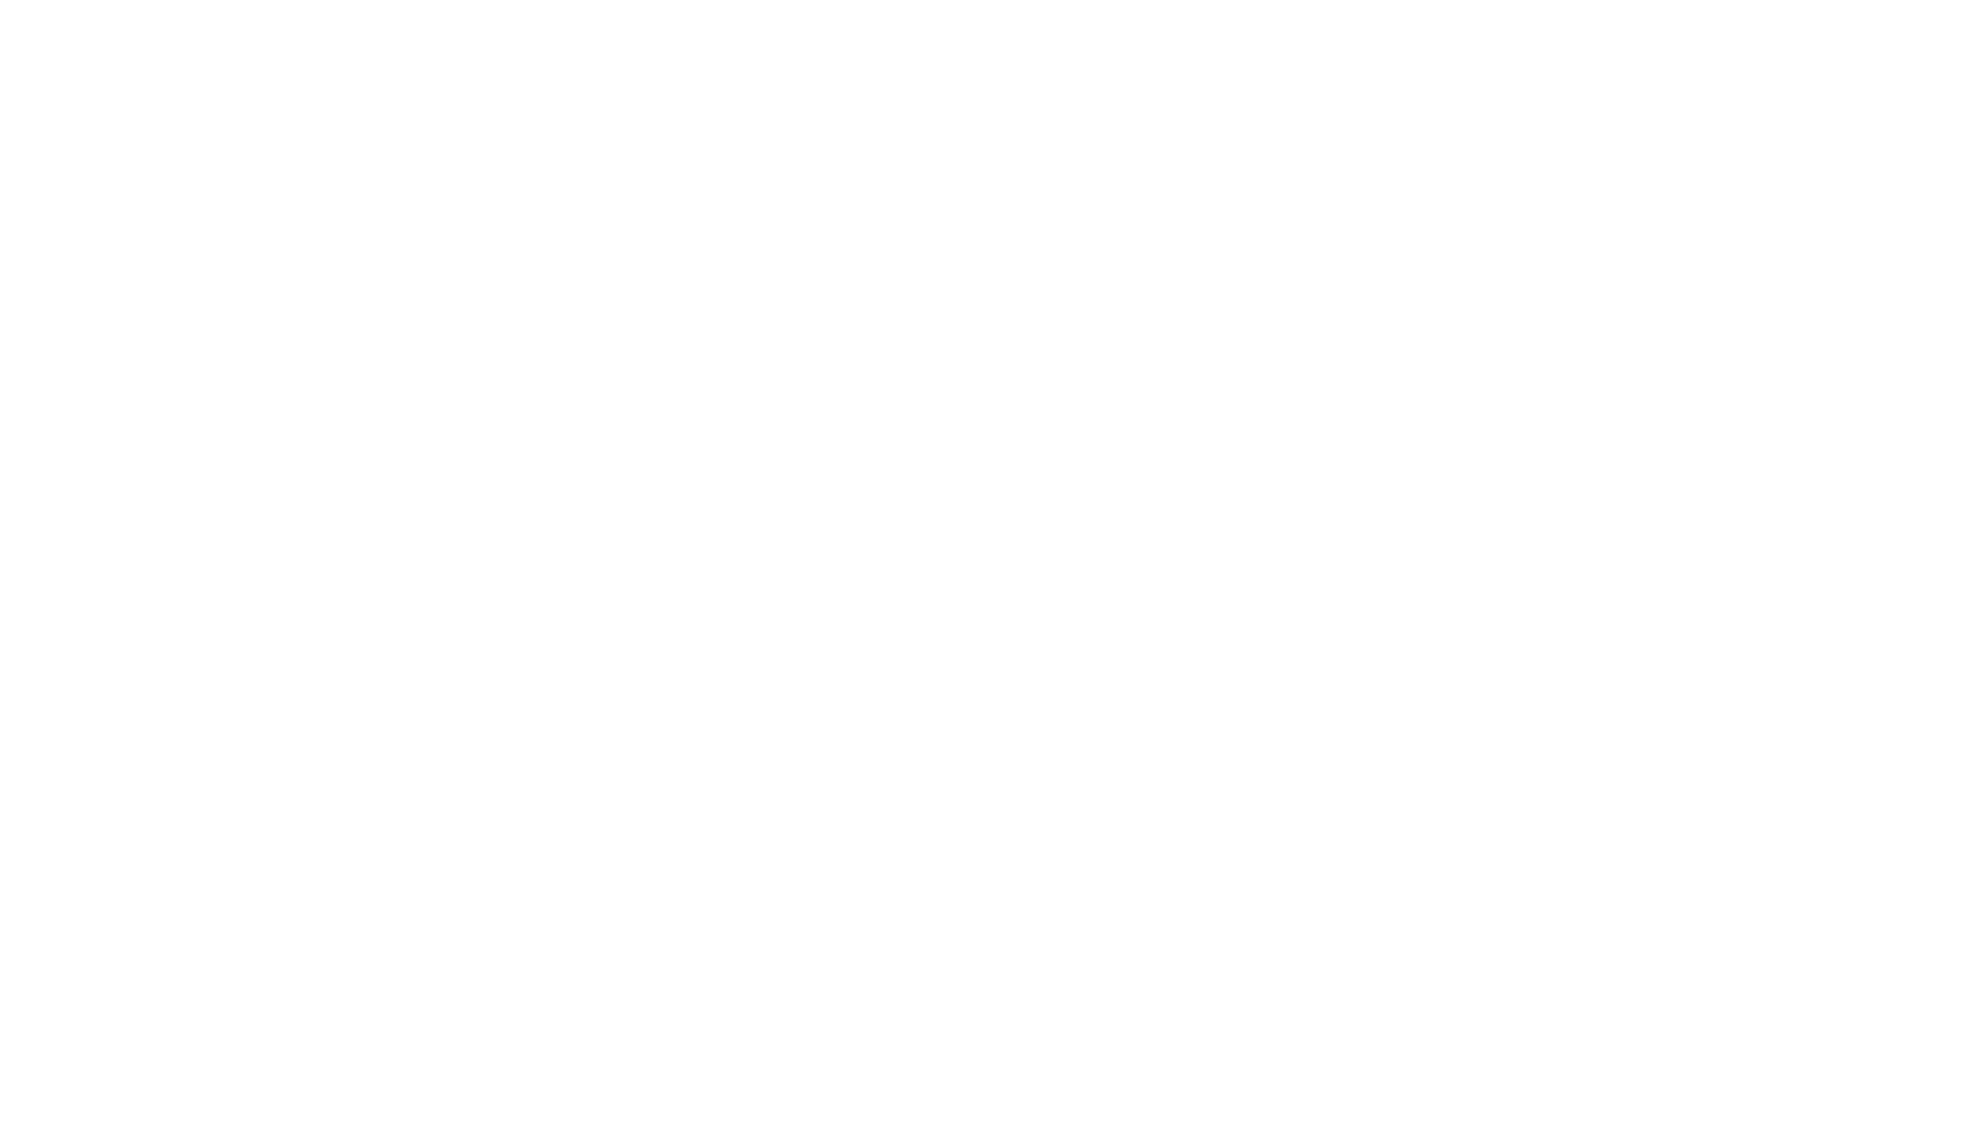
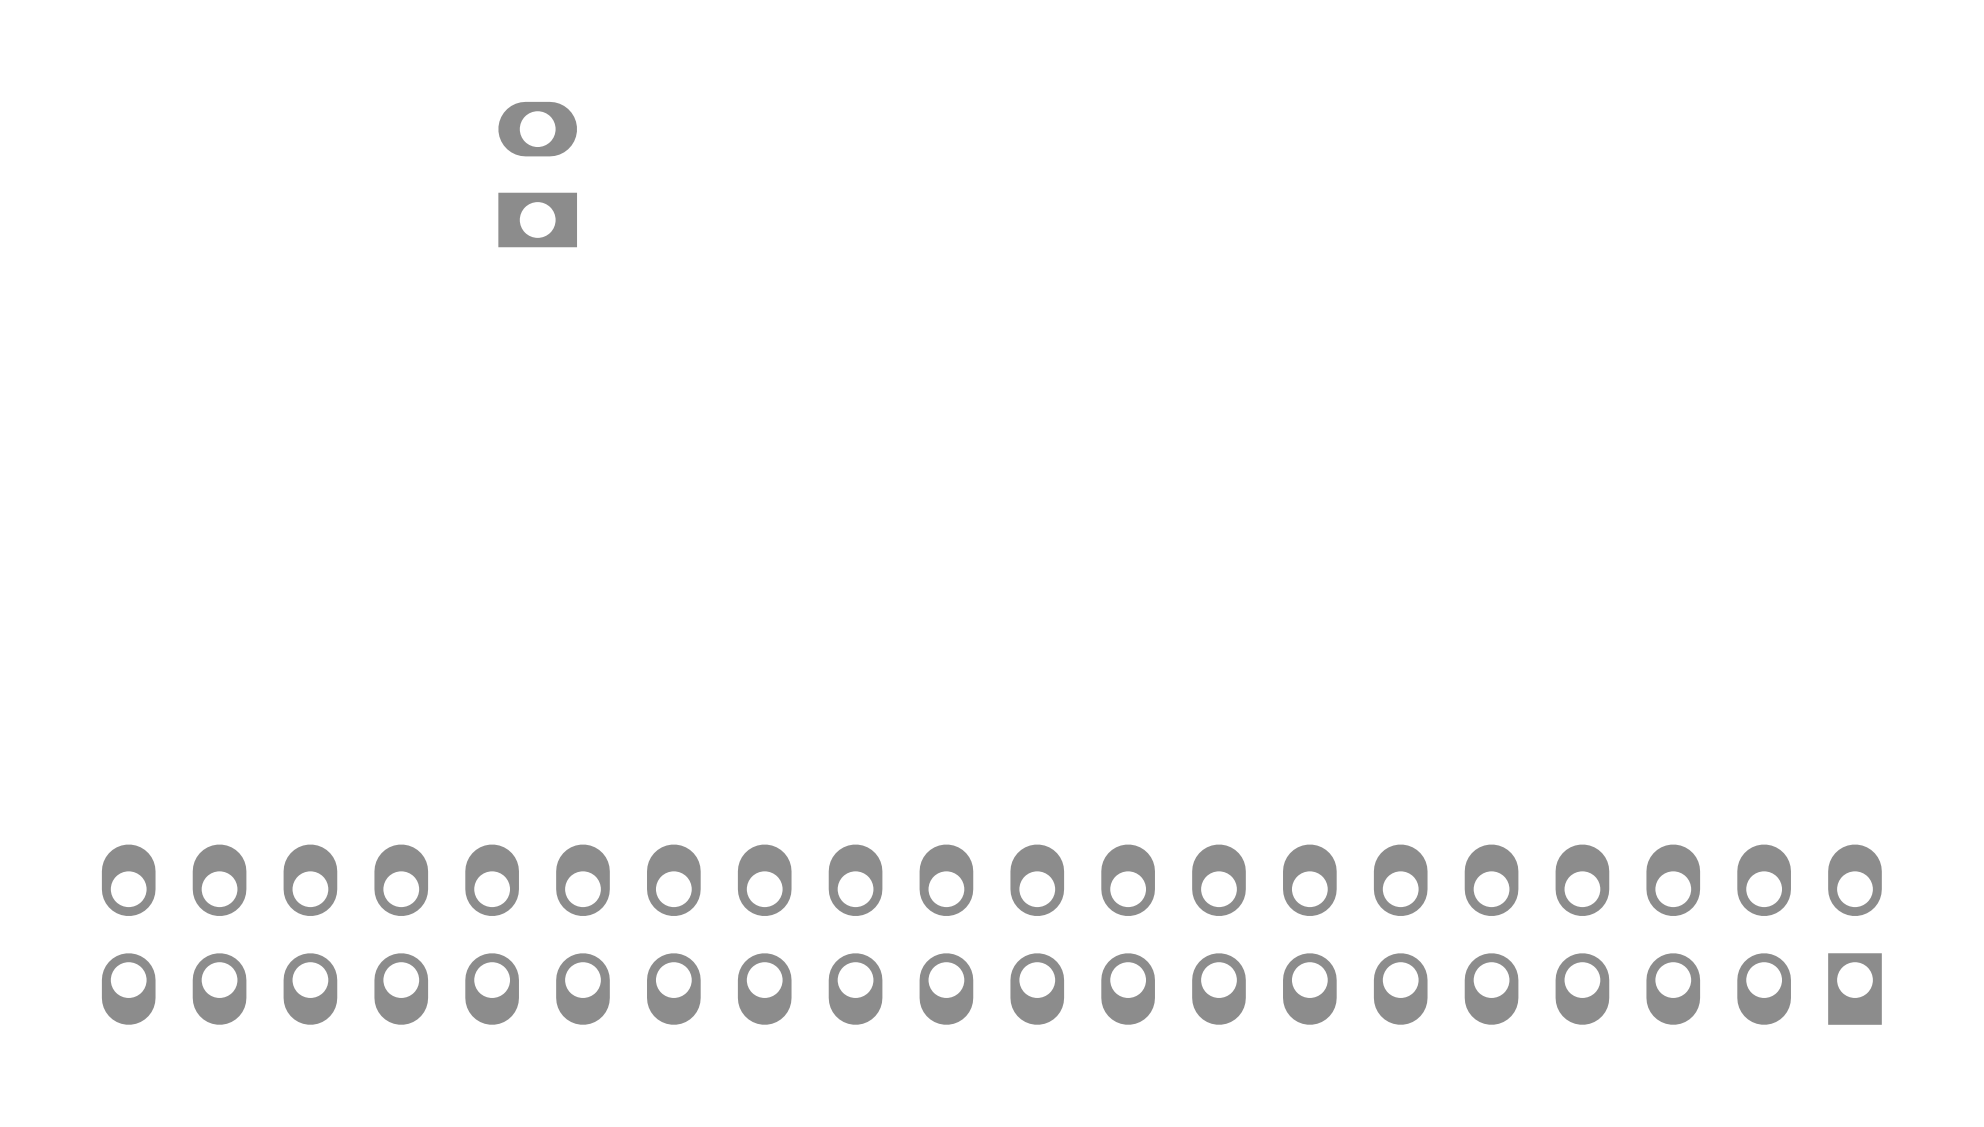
part: none -> (537, 174)
part: none -> (991, 934)

